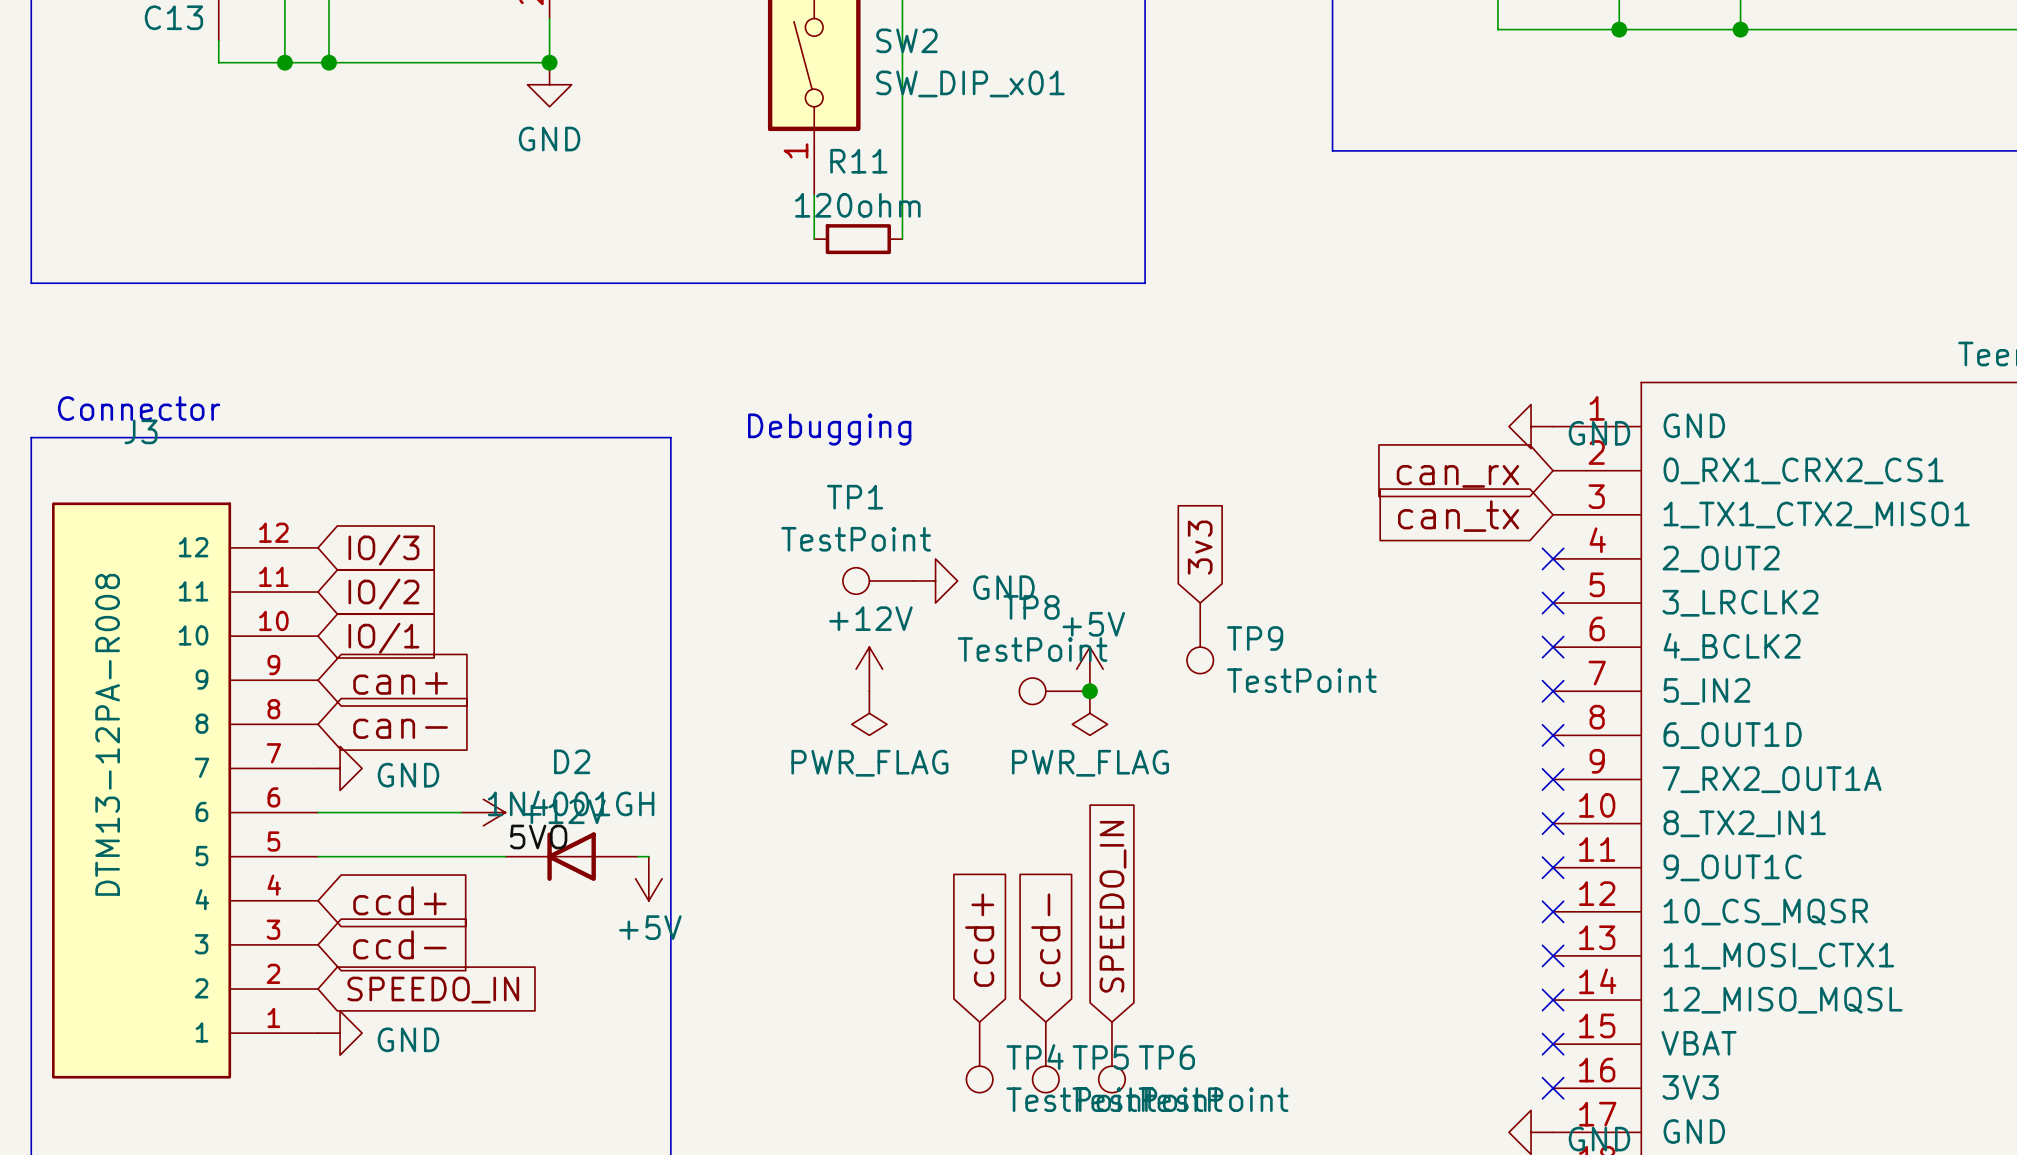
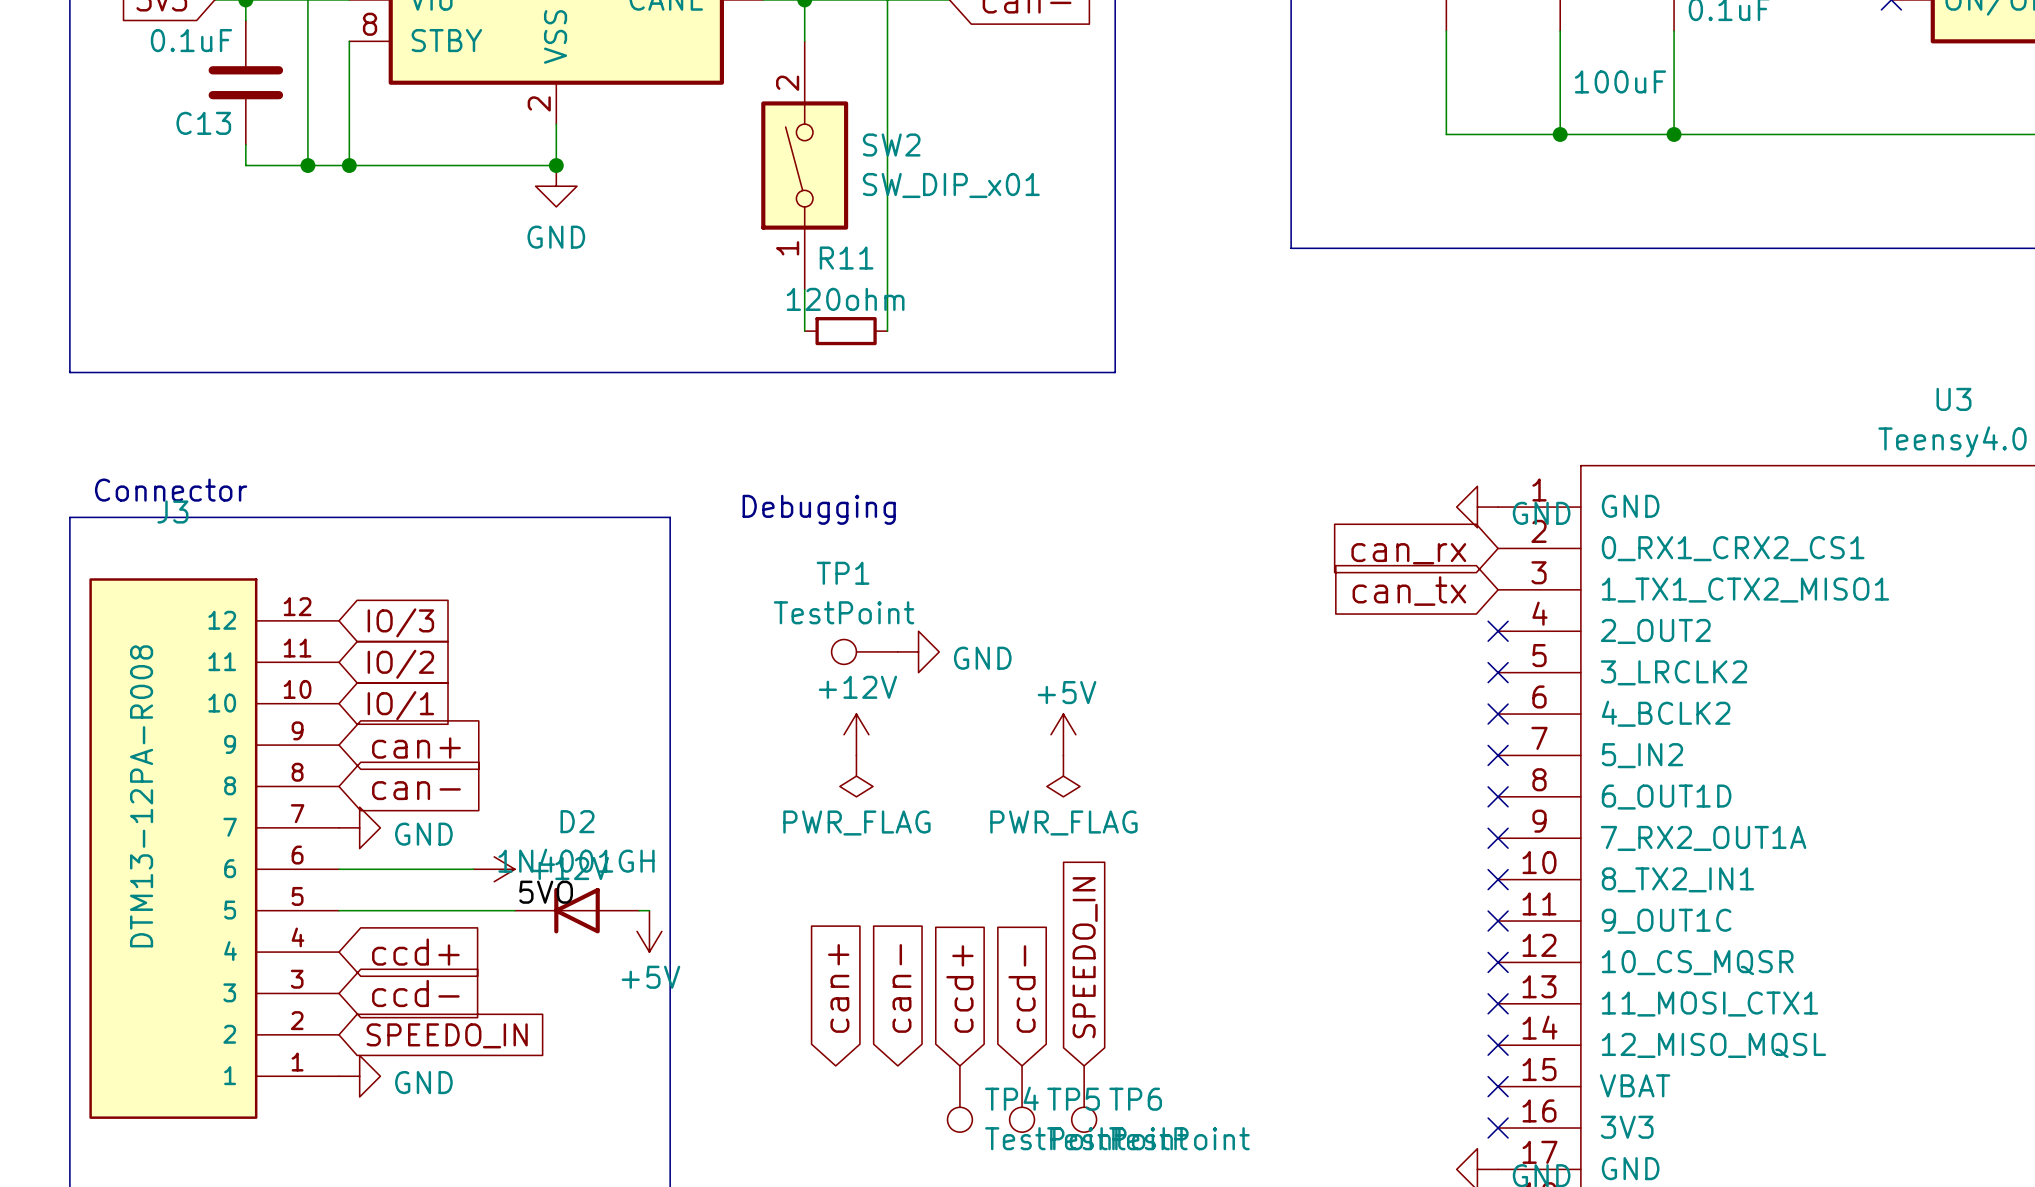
global label: 3v3 (1200, 547) -> none
TP9: TestPoint (1200, 638) -> none
TP8: TestPoint (1054, 691) -> none
junction: (1089, 691) -> none
global label: none -> can+ (838, 988)
global label: none -> can- (901, 988)

